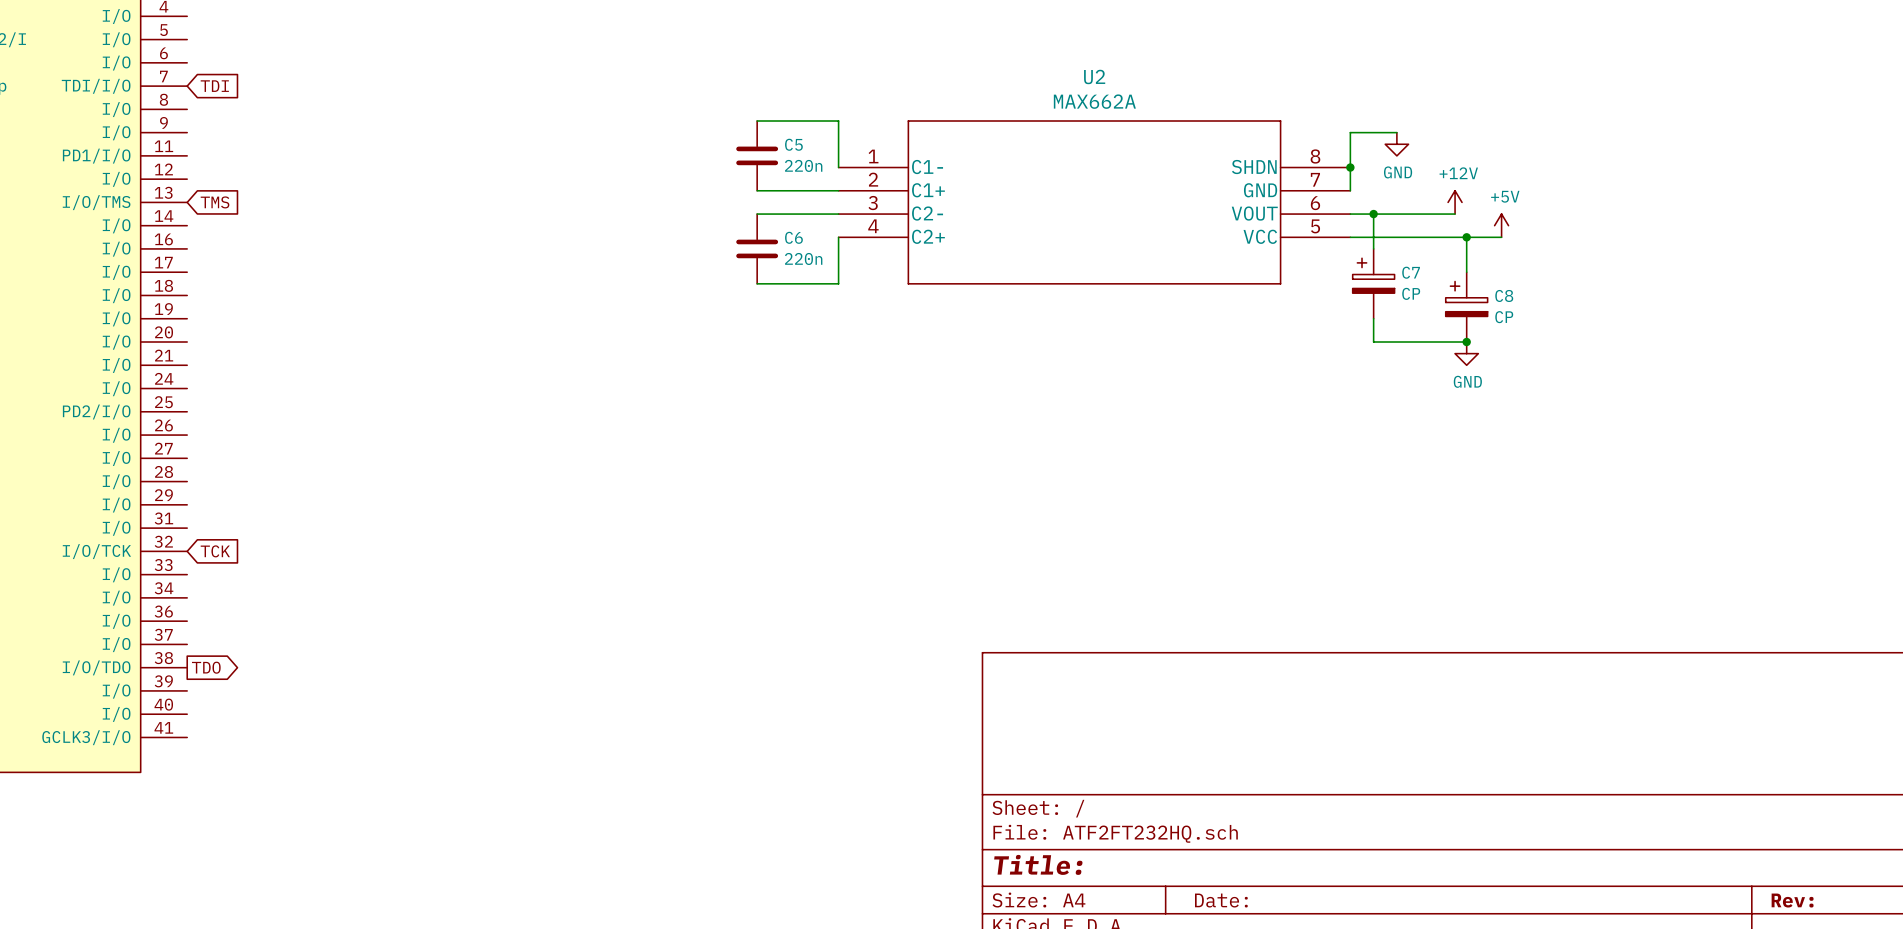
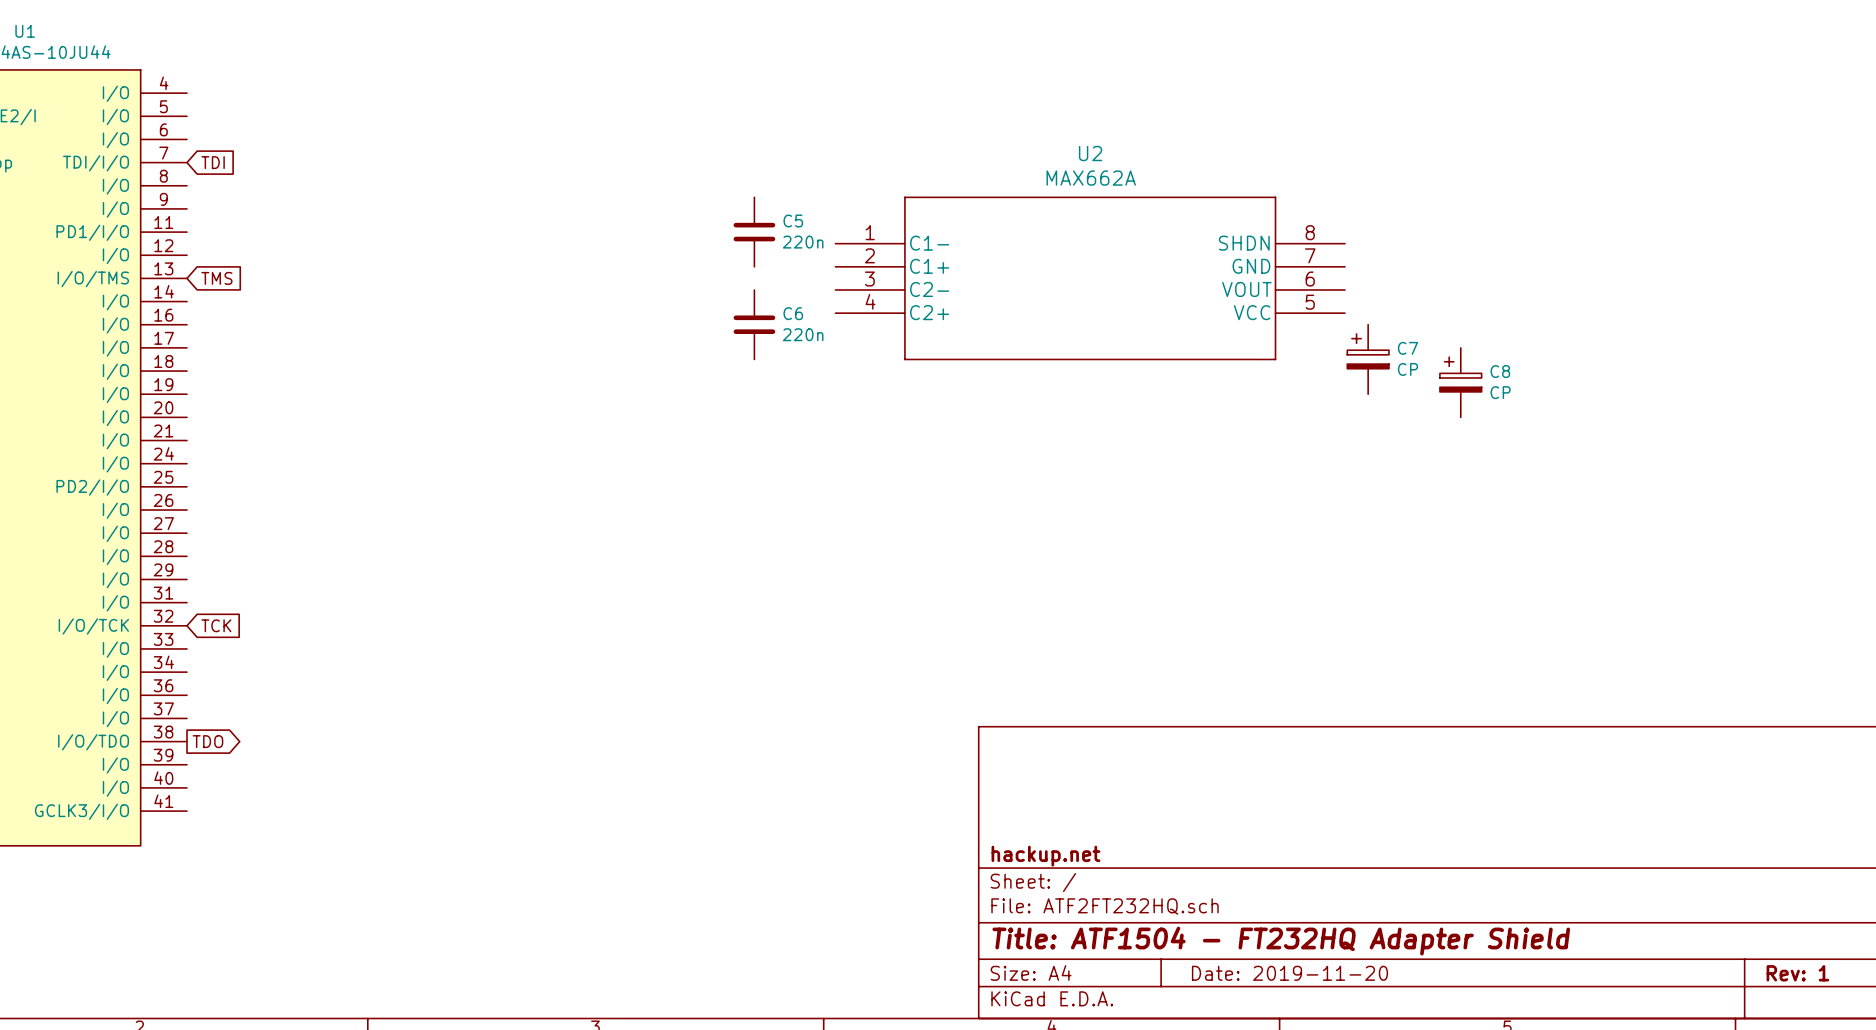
wire: (757, 121) (838, 121) (838, 167) -> none
wire: (1396, 132) (1350, 132) (1350, 190) -> none
power symbol: GND (1396, 144) -> none
junction: (1350, 167) -> none
wire: (757, 190) (838, 190) -> none
power symbol: +12V (1455, 202) -> none
wire: (757, 214) (838, 214) -> none
wire: (1350, 214) (1455, 214) -> none
wire: (1373, 214) (1373, 248) -> none
junction: (1373, 214) -> none
power symbol: +5V (1501, 225) -> none
wire: (838, 237) (838, 283) (757, 283) -> none
wire: (1350, 237) (1501, 237) -> none
wire: (1466, 237) (1466, 272) -> none
junction: (1466, 237) -> none
wire: (1373, 318) (1373, 342) (1466, 342) -> none
junction: (1466, 342) -> none
power symbol: GND (1466, 353) -> none
title block: none -> hackup.net (1045, 856)
title block: Title: (1038, 864) -> Title: ATF1504 - FT232HQ Adapter Shield (1281, 941)
title block: Date: (1221, 900) -> Date: 2019-11-20 (1289, 973)
title block: Rev: (1792, 900) -> Rev: 1 (1797, 973)

